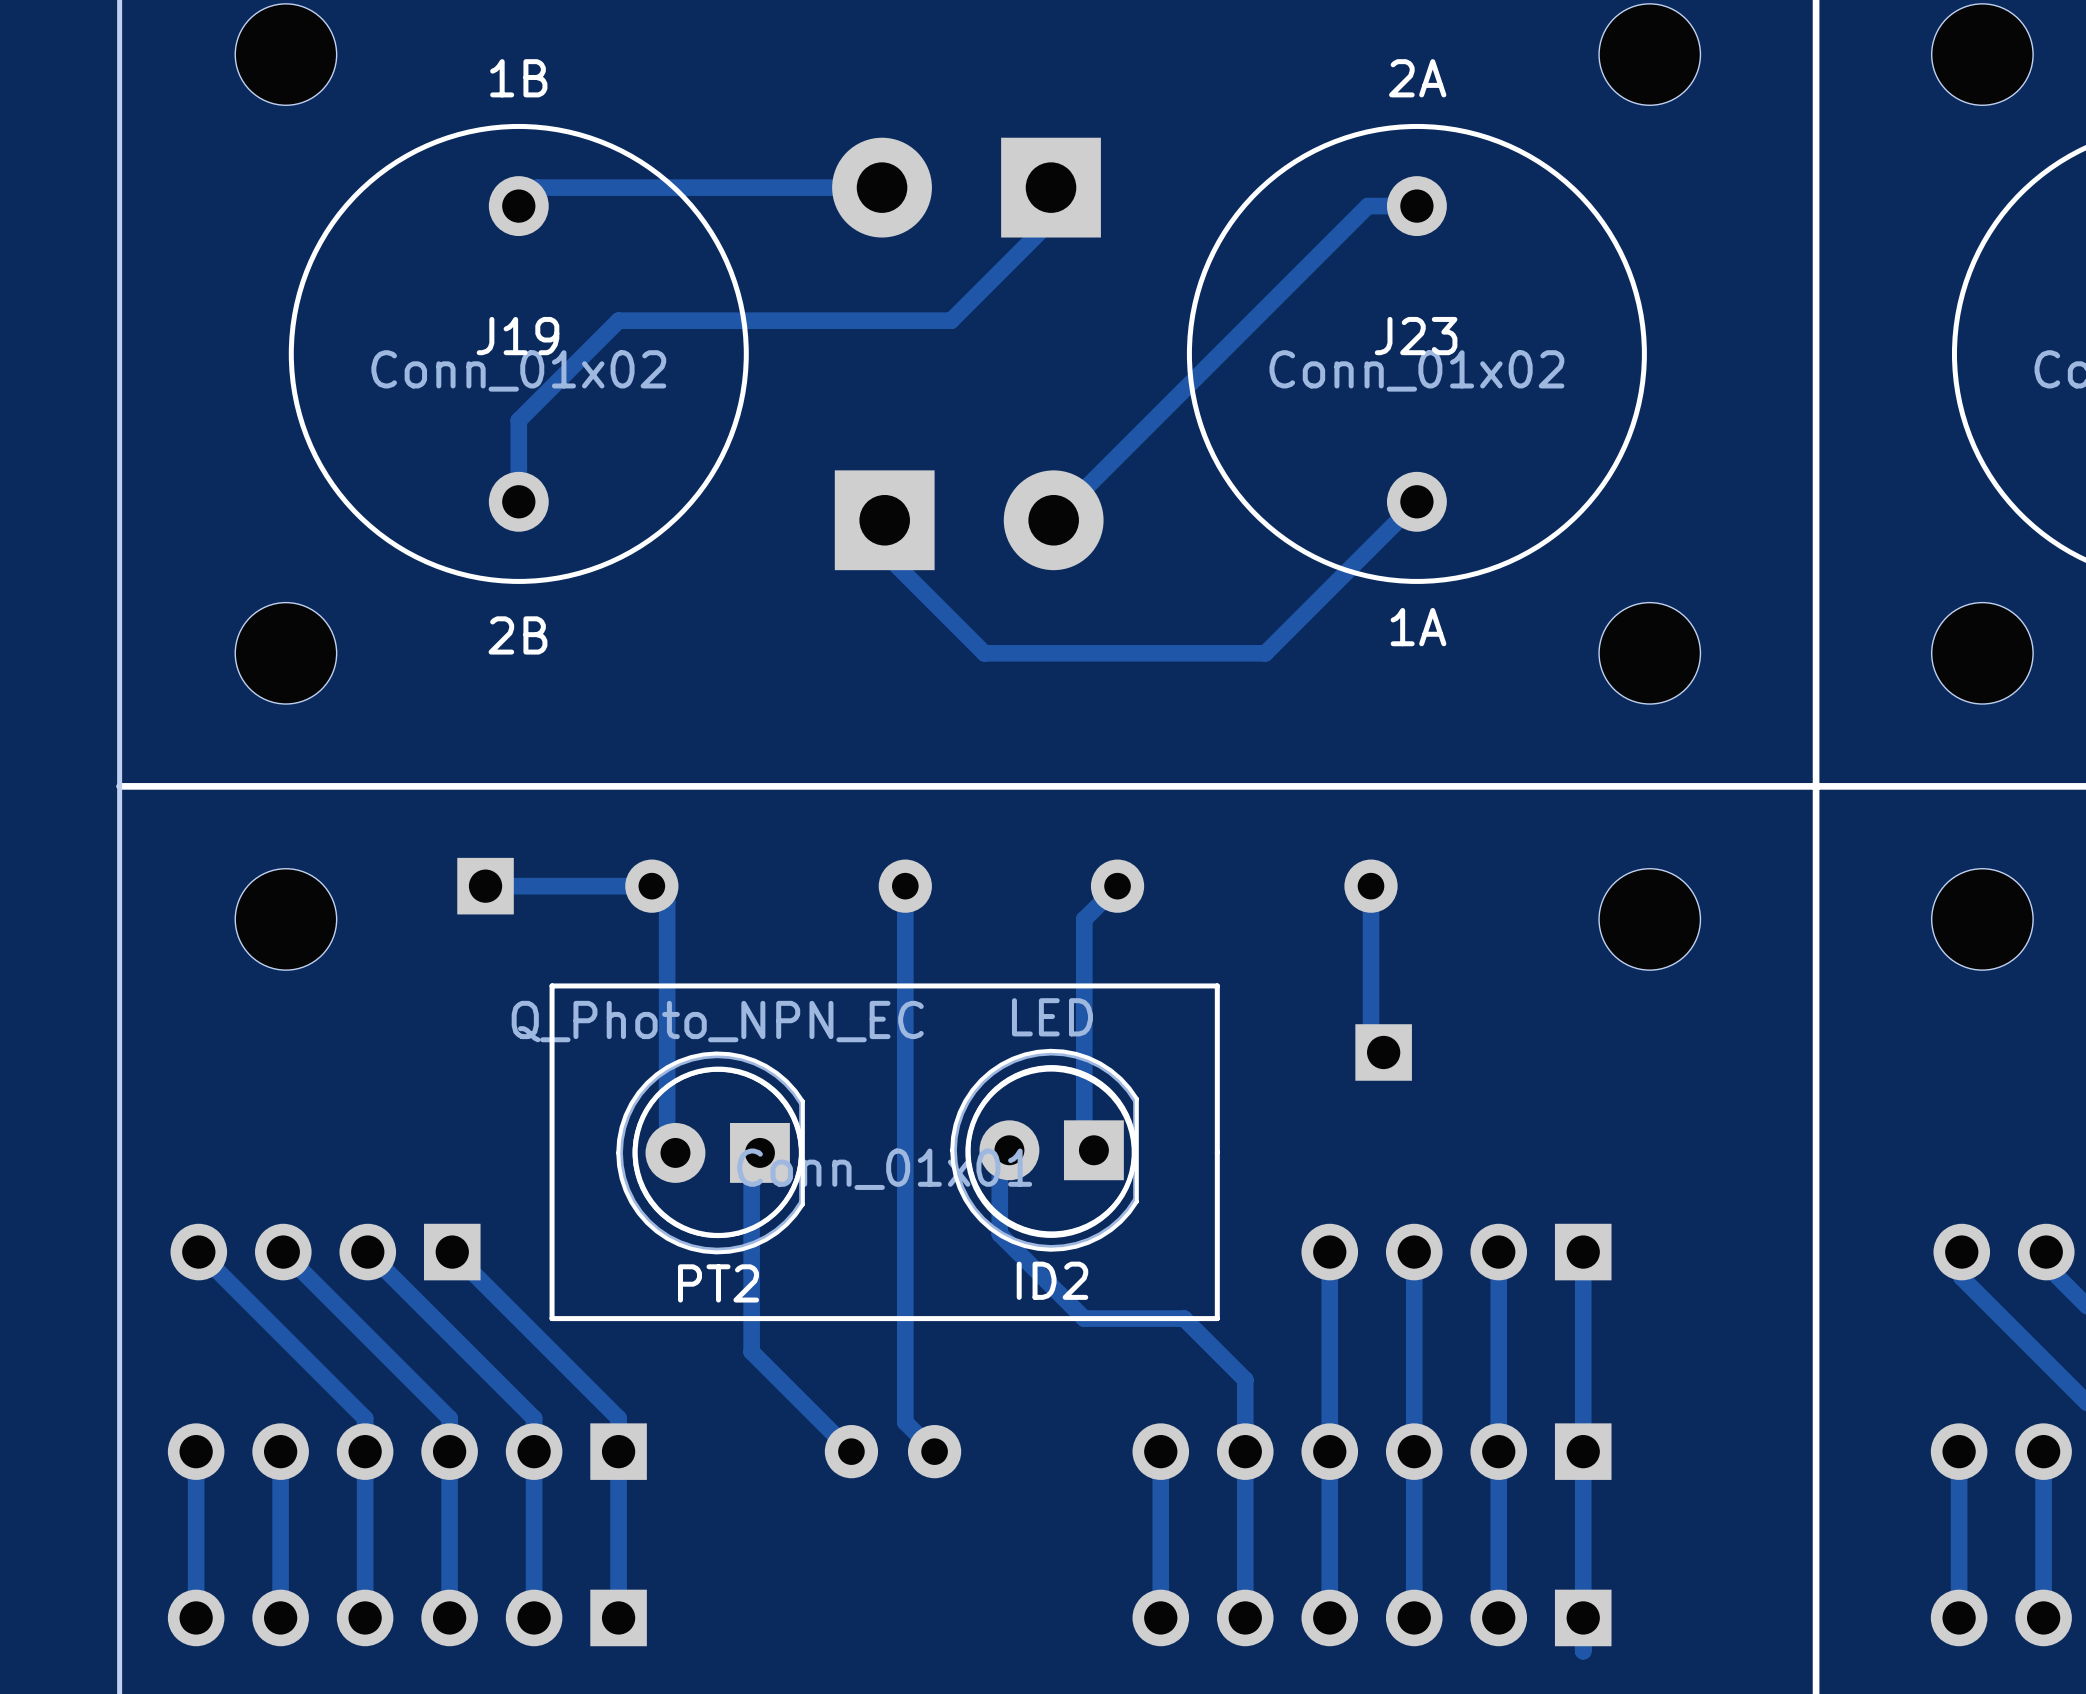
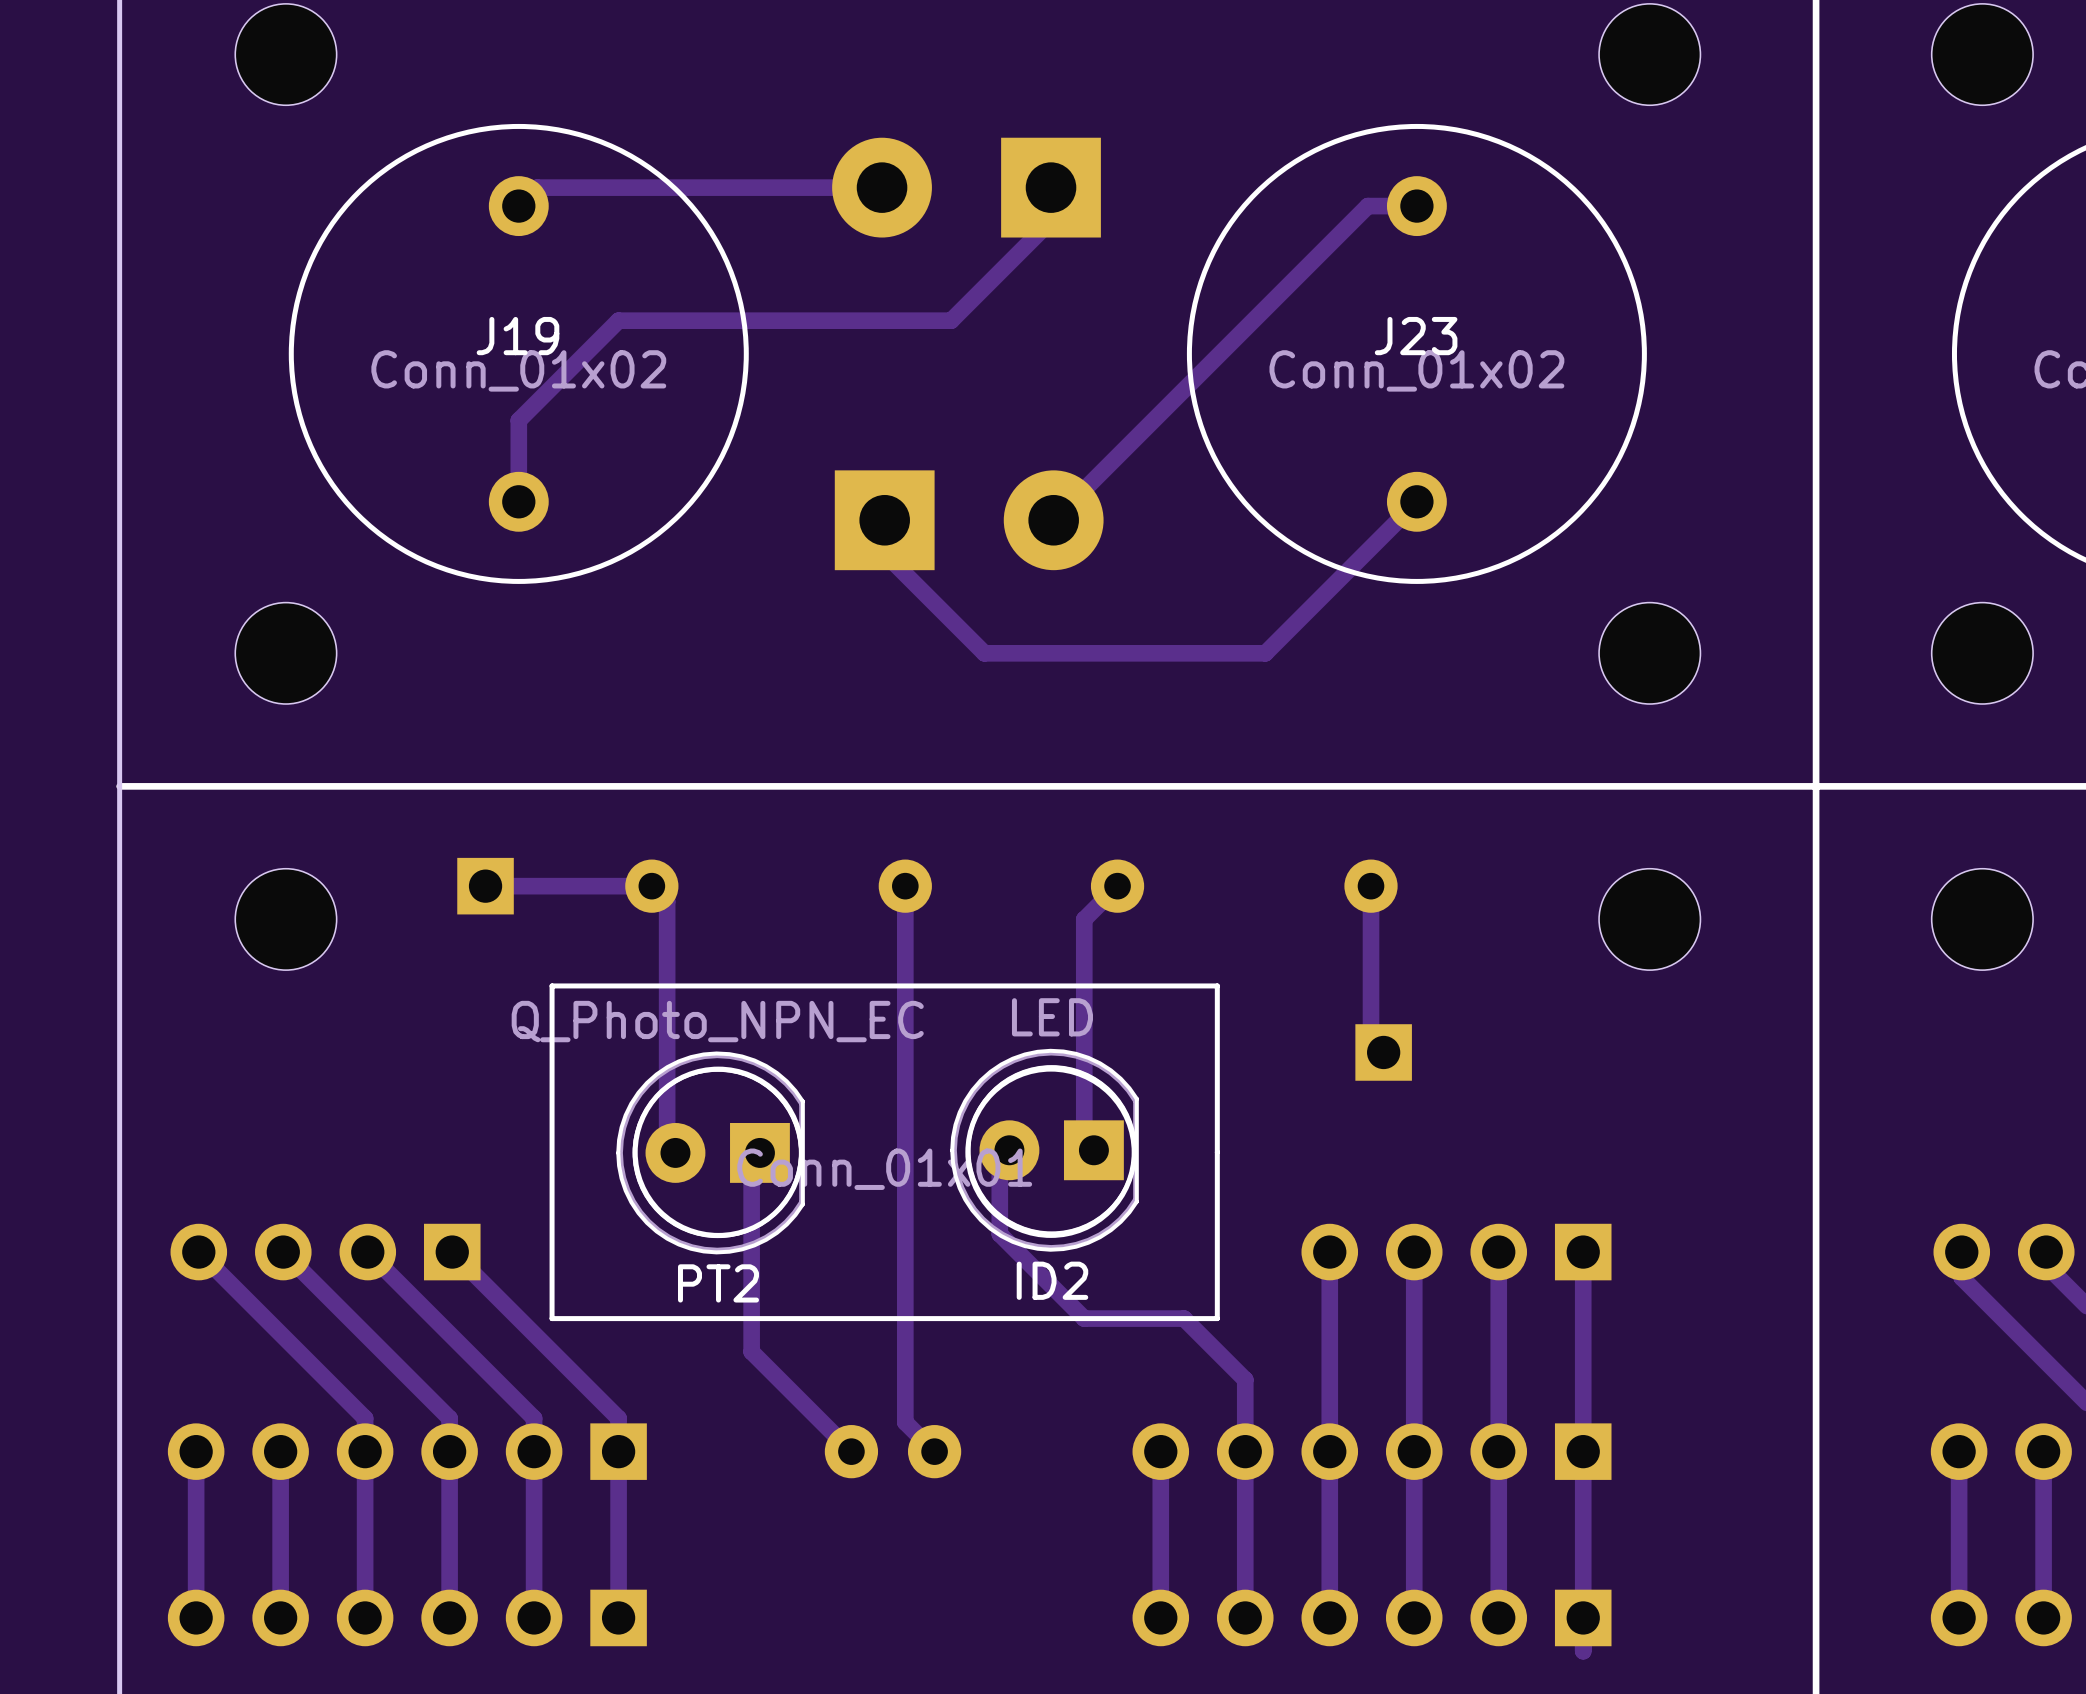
text: 1B (518, 78) -> none
text: 2A (1417, 78) -> none
text: 1A (1418, 627) -> none
text: 2B (518, 635) -> none

